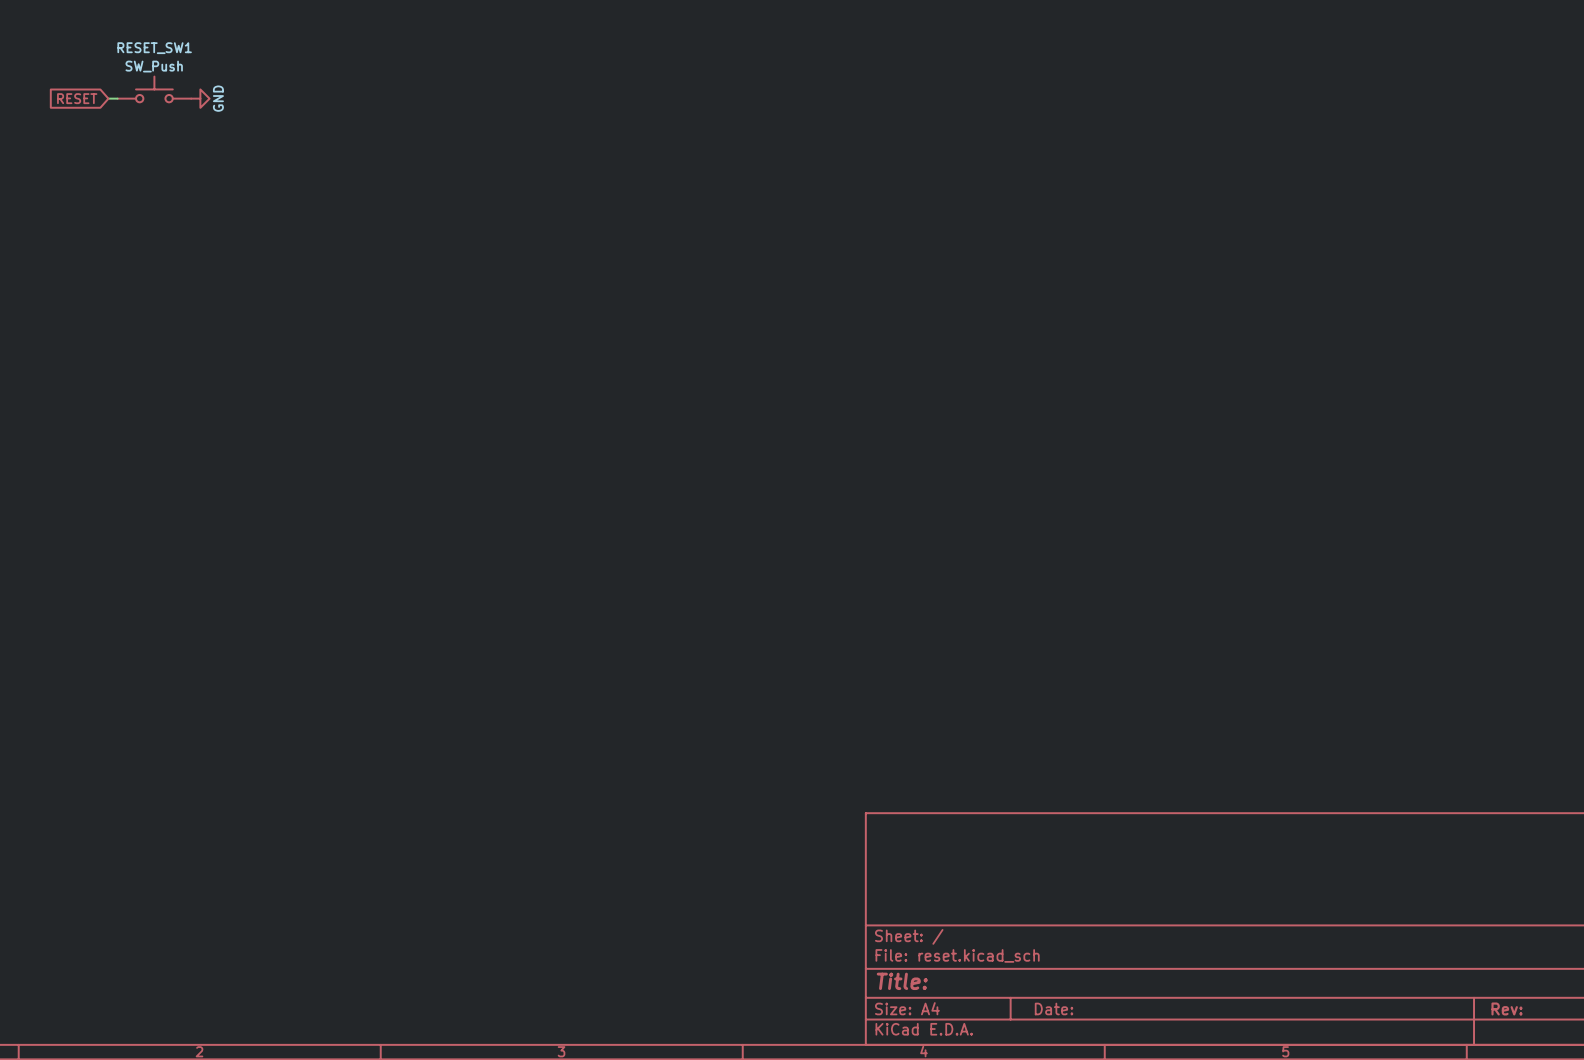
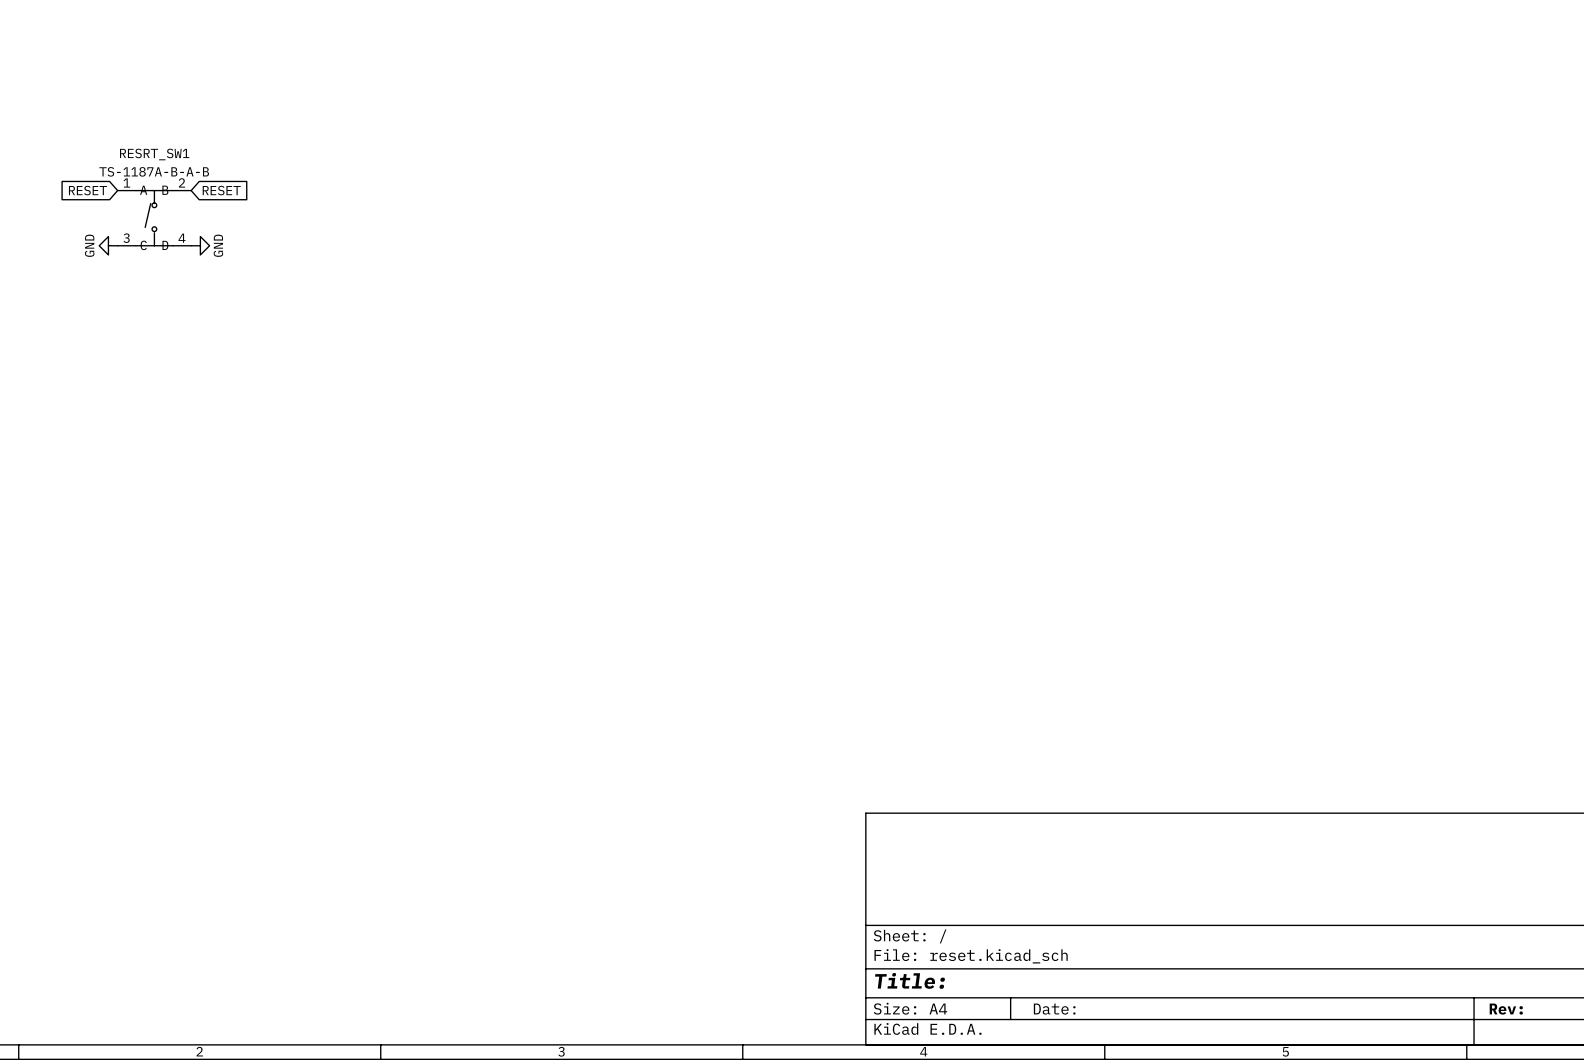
RESET_SW1: SW_Push (154, 89) -> none
global label: RESET (77, 98) -> none
wire: (108, 98) (117, 98) -> none
power symbol: GND (200, 98) -> none
global label: none -> RESET (87, 190)
global label: none -> RESET (221, 190)
RESRT_SW1: none -> TS-1187A-B-A-B (154, 218)
power symbol: none -> GND (108, 245)
power symbol: none -> GND (200, 245)

